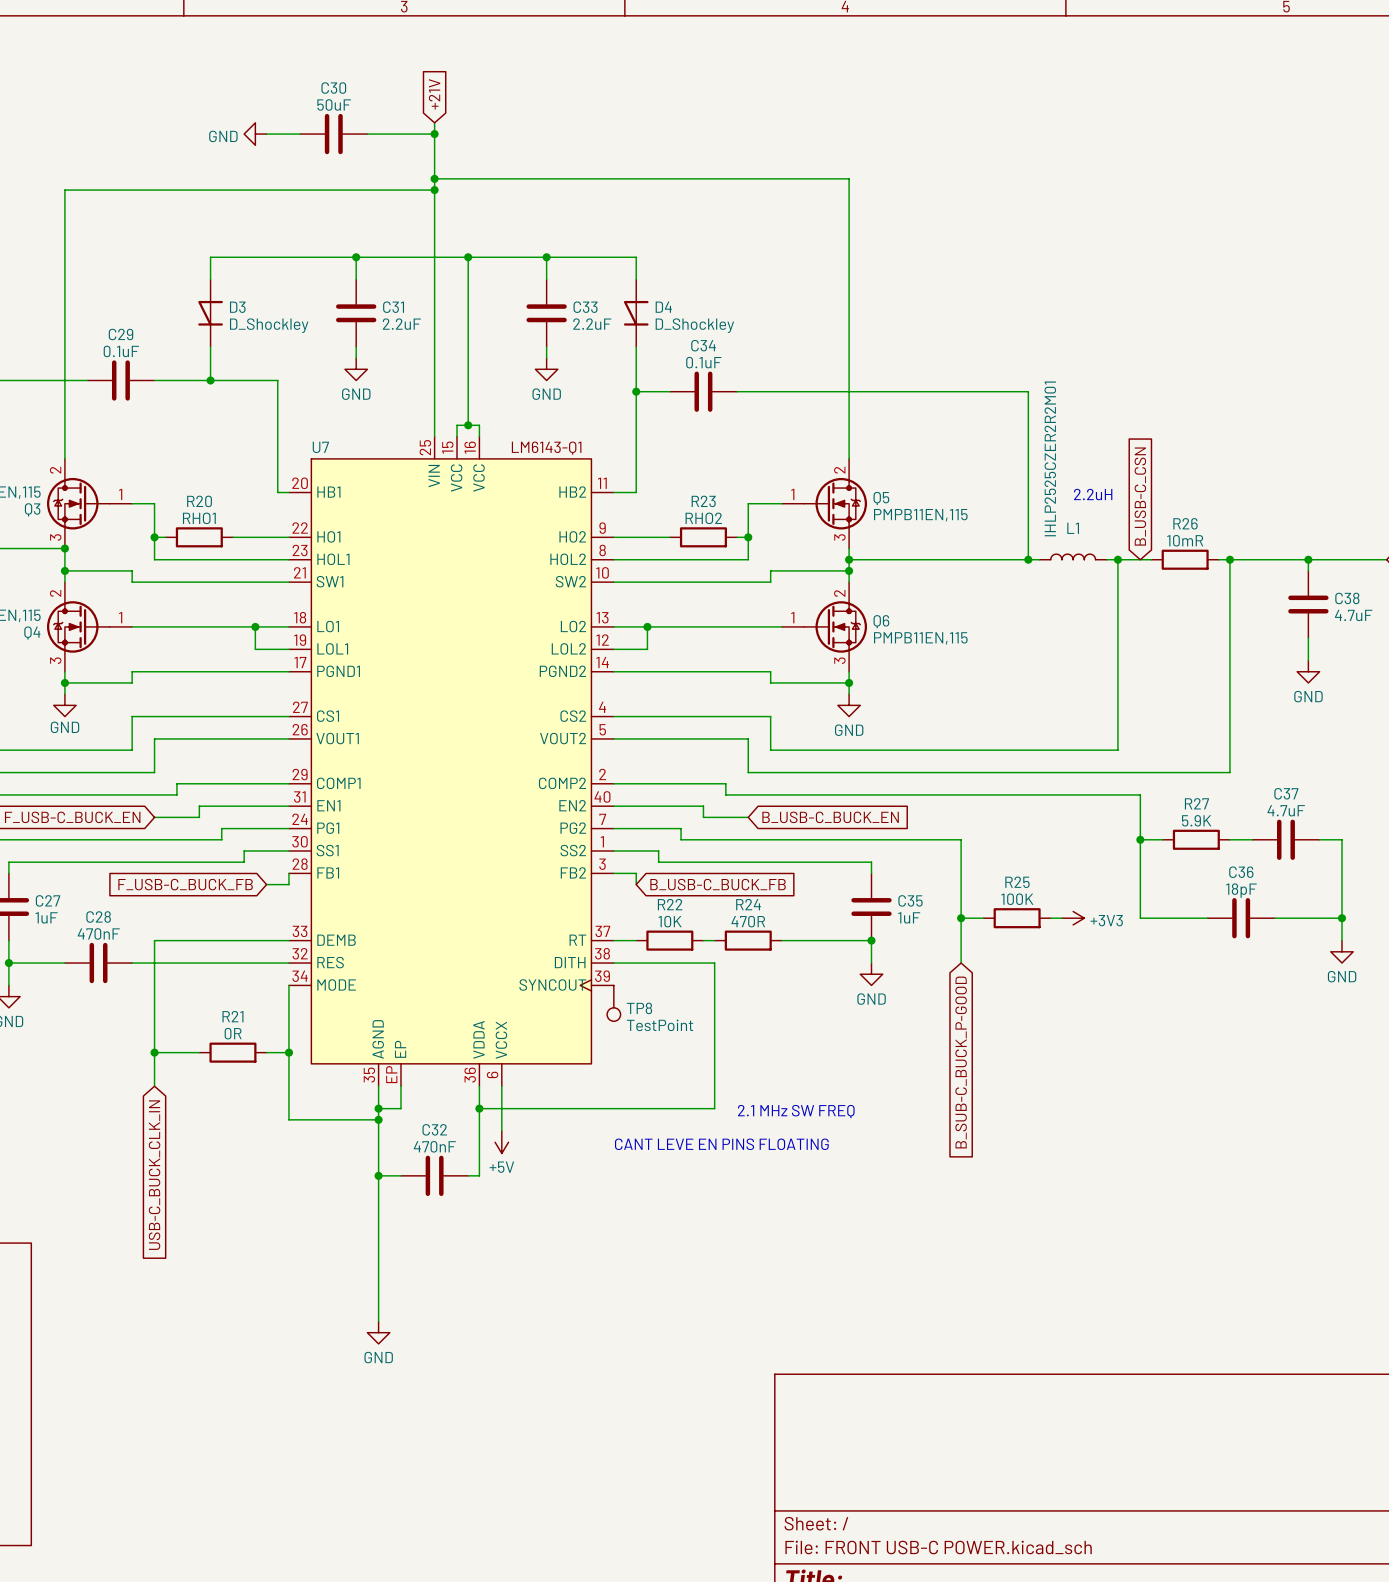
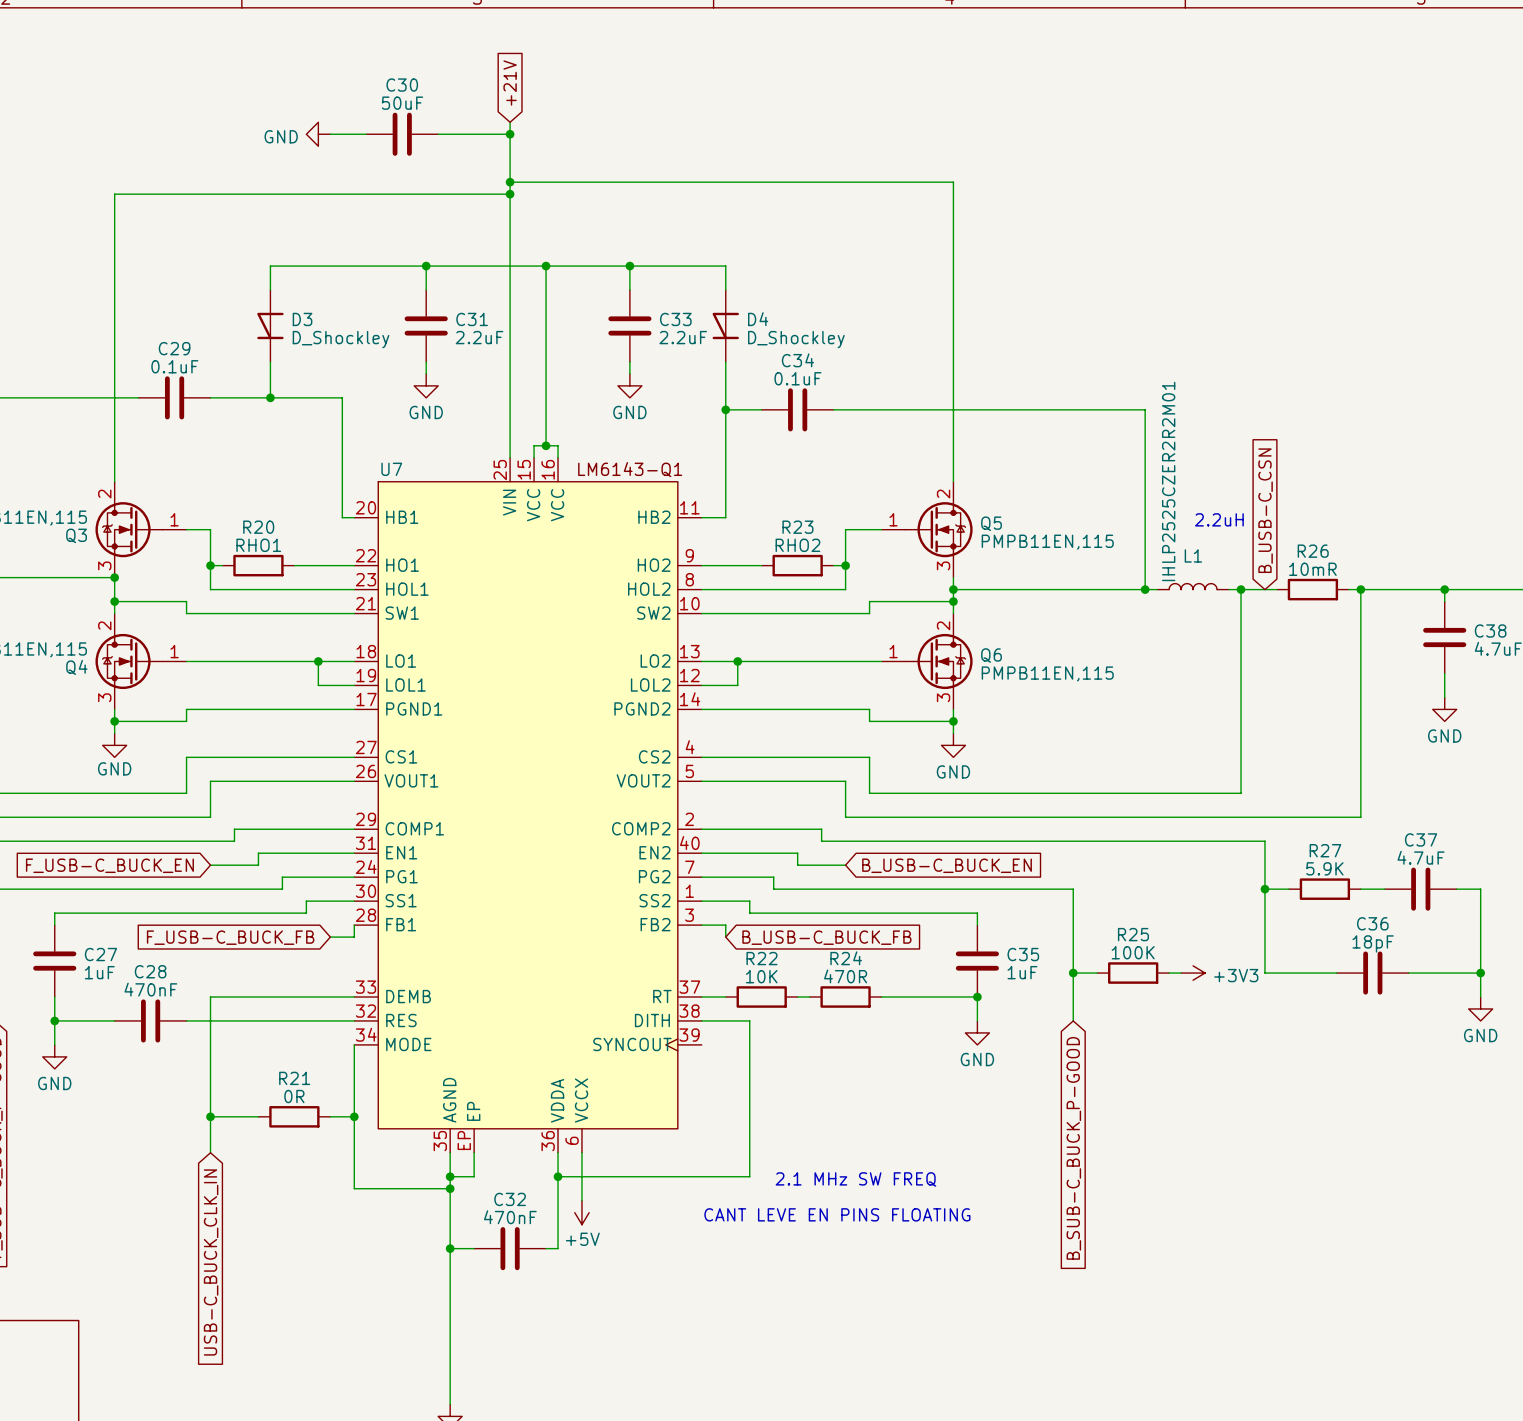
wire: (658, 963) (714, 963) (714, 1108) (658, 1108) -> (749, 1020) (749, 1176)
TP8: TestPoint (613, 1003) -> none
text position: 2.1 MHz SW FREQ (796, 1111) -> 2.1 MHz SW FREQ (855, 1179)

